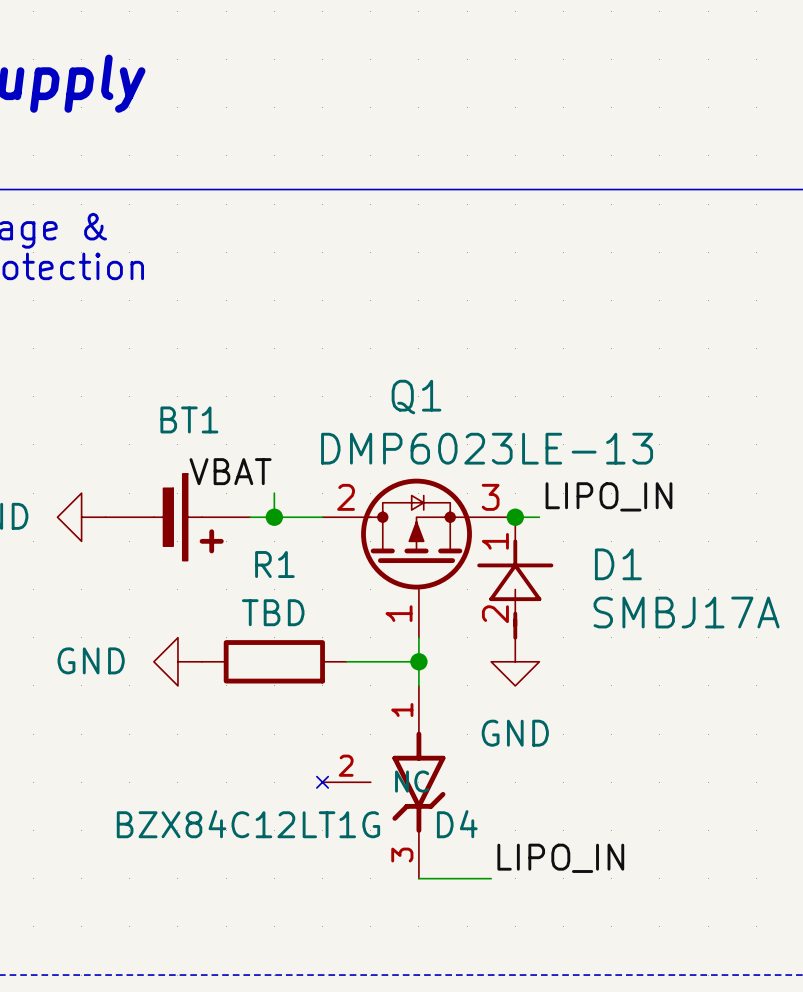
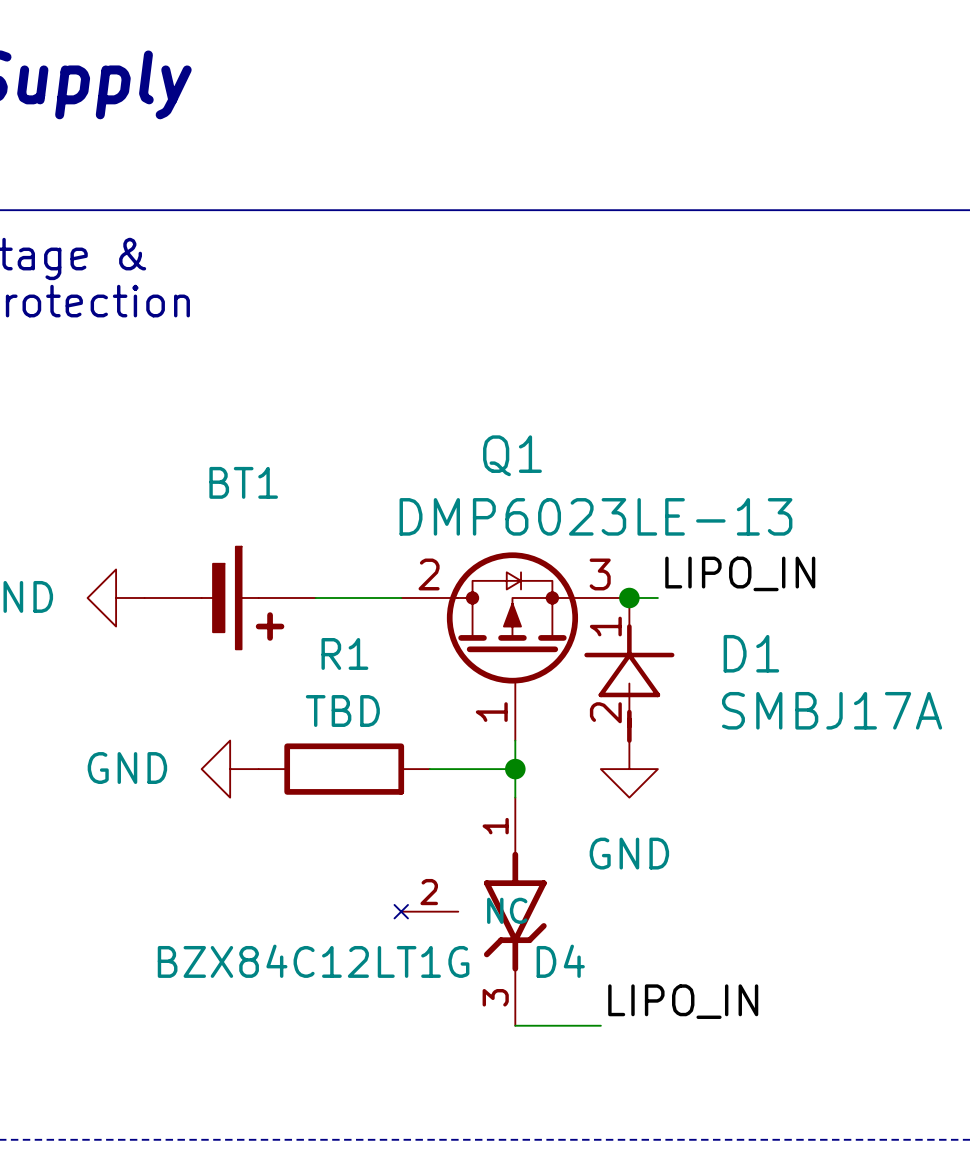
label: VBAT (230, 471) -> none
wire: (274, 493) (274, 517) -> none
junction: (274, 517) -> none

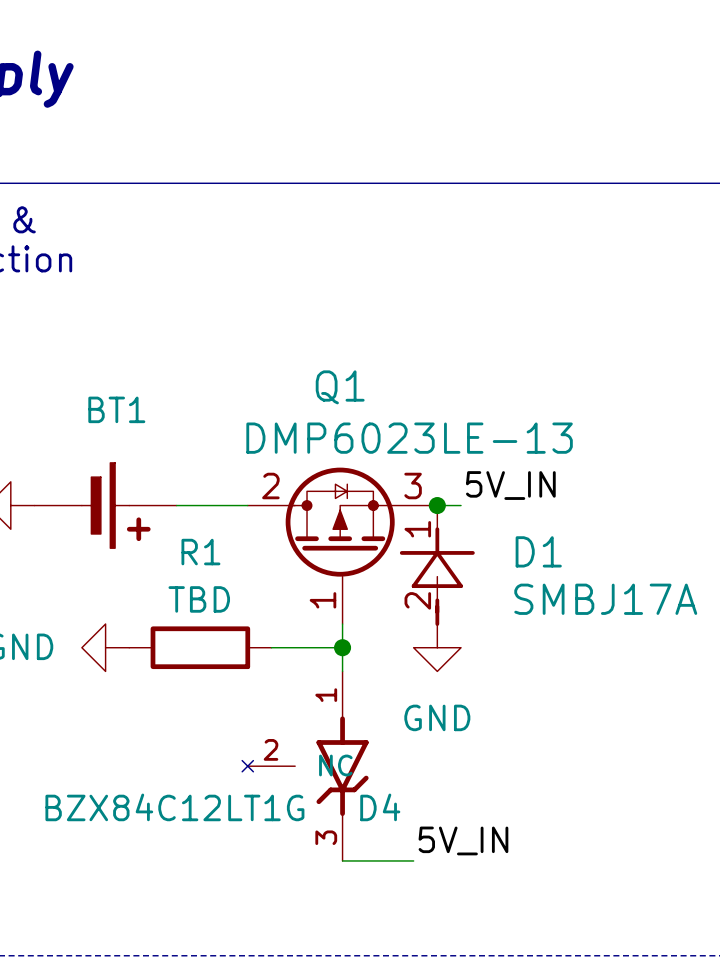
label: LIPO_IN (740, 573) -> 5V_IN (510, 485)
label: LIPO_IN (683, 1001) -> 5V_IN (463, 840)

